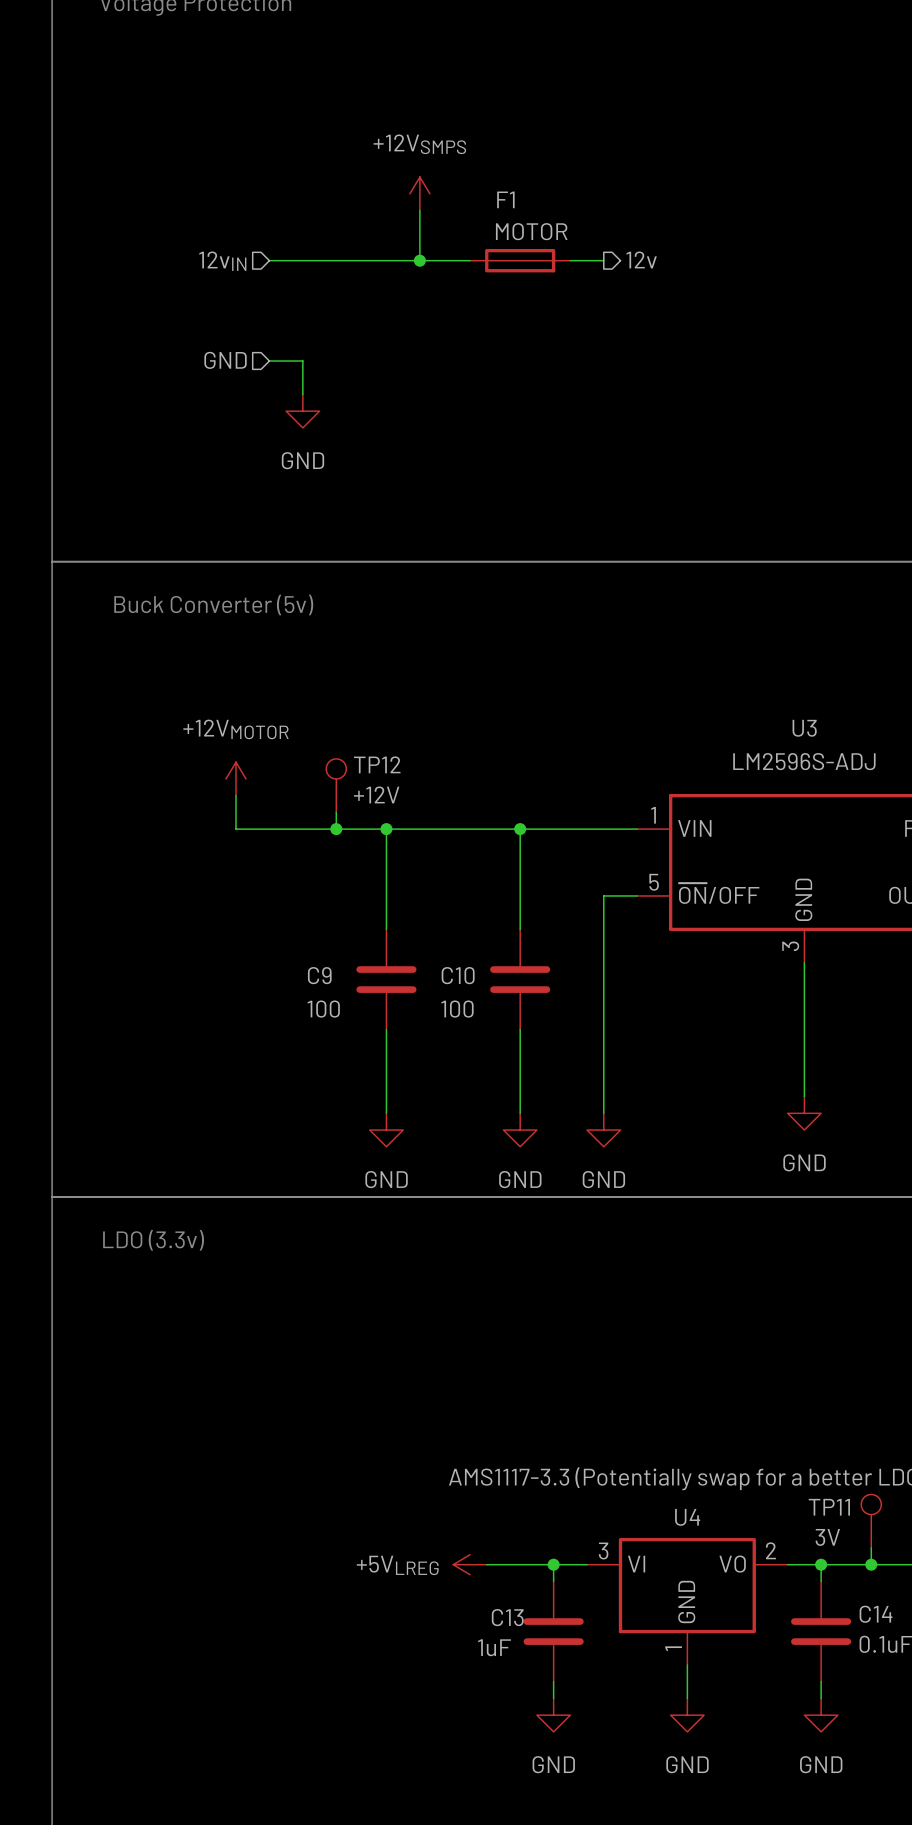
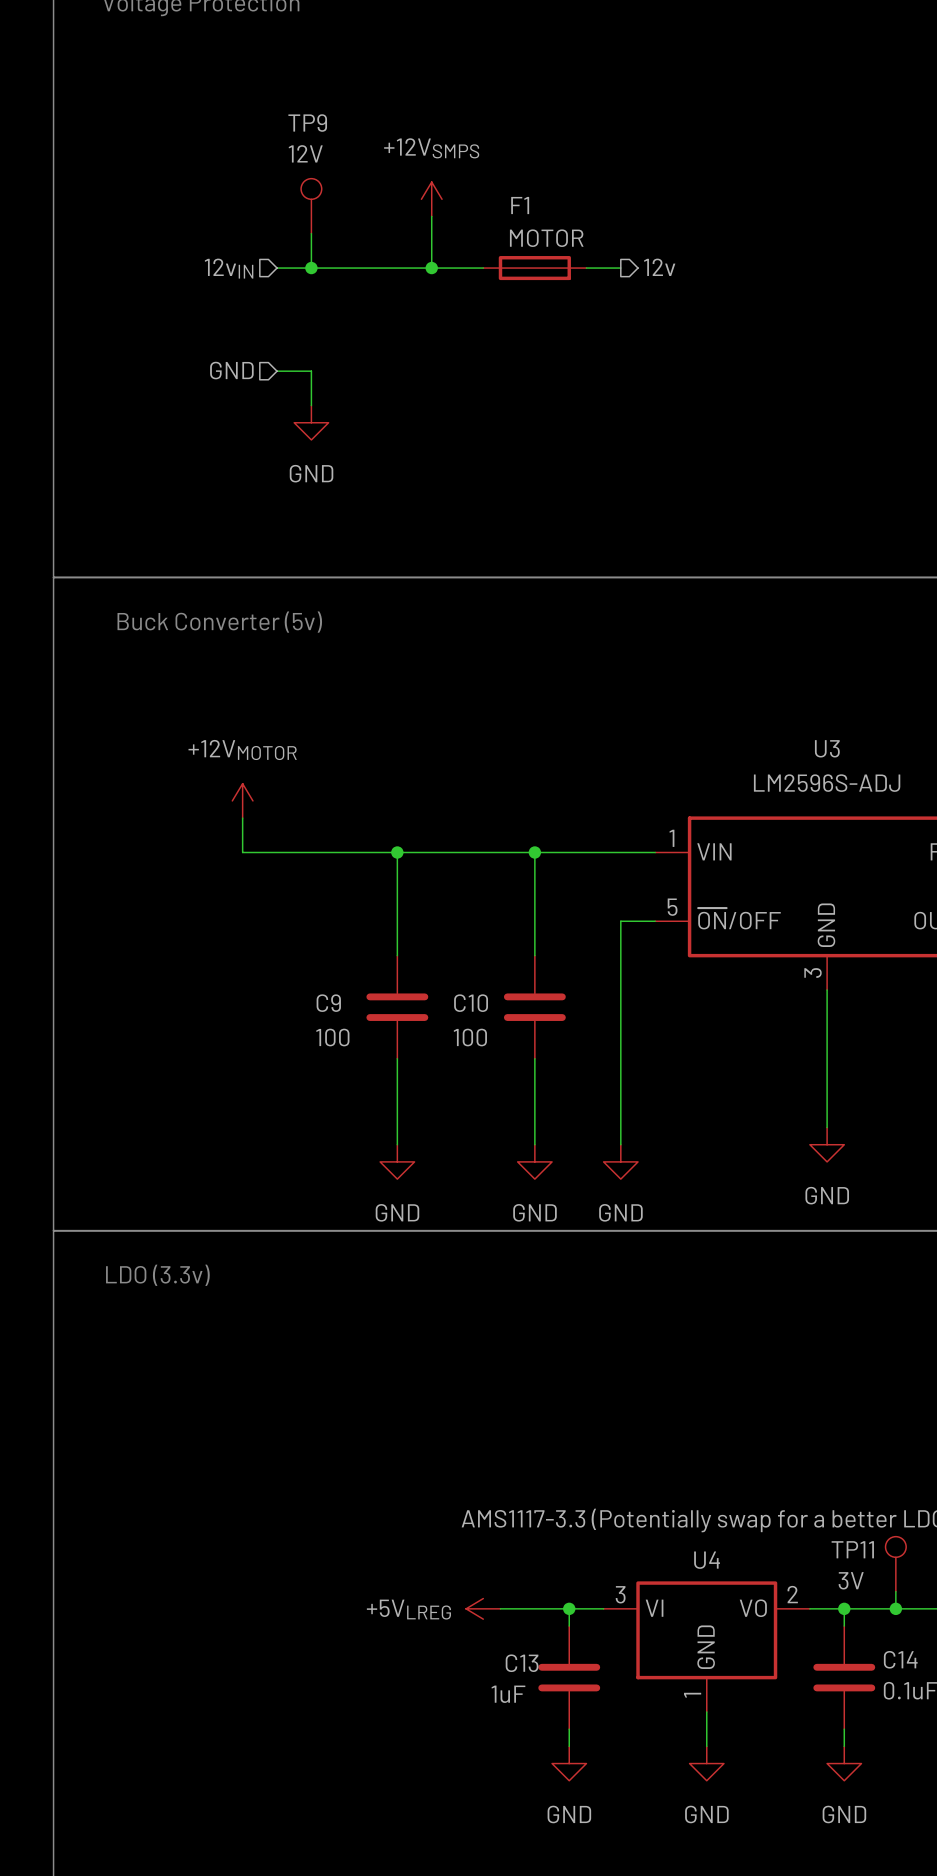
TP9: none -> 12V (311, 206)
wire: none -> (311, 233) (311, 268)
junction: none -> (311, 268)
TP12: +12V (336, 785) -> none
wire: (336, 812) (336, 829) -> none
junction: (336, 829) -> none

